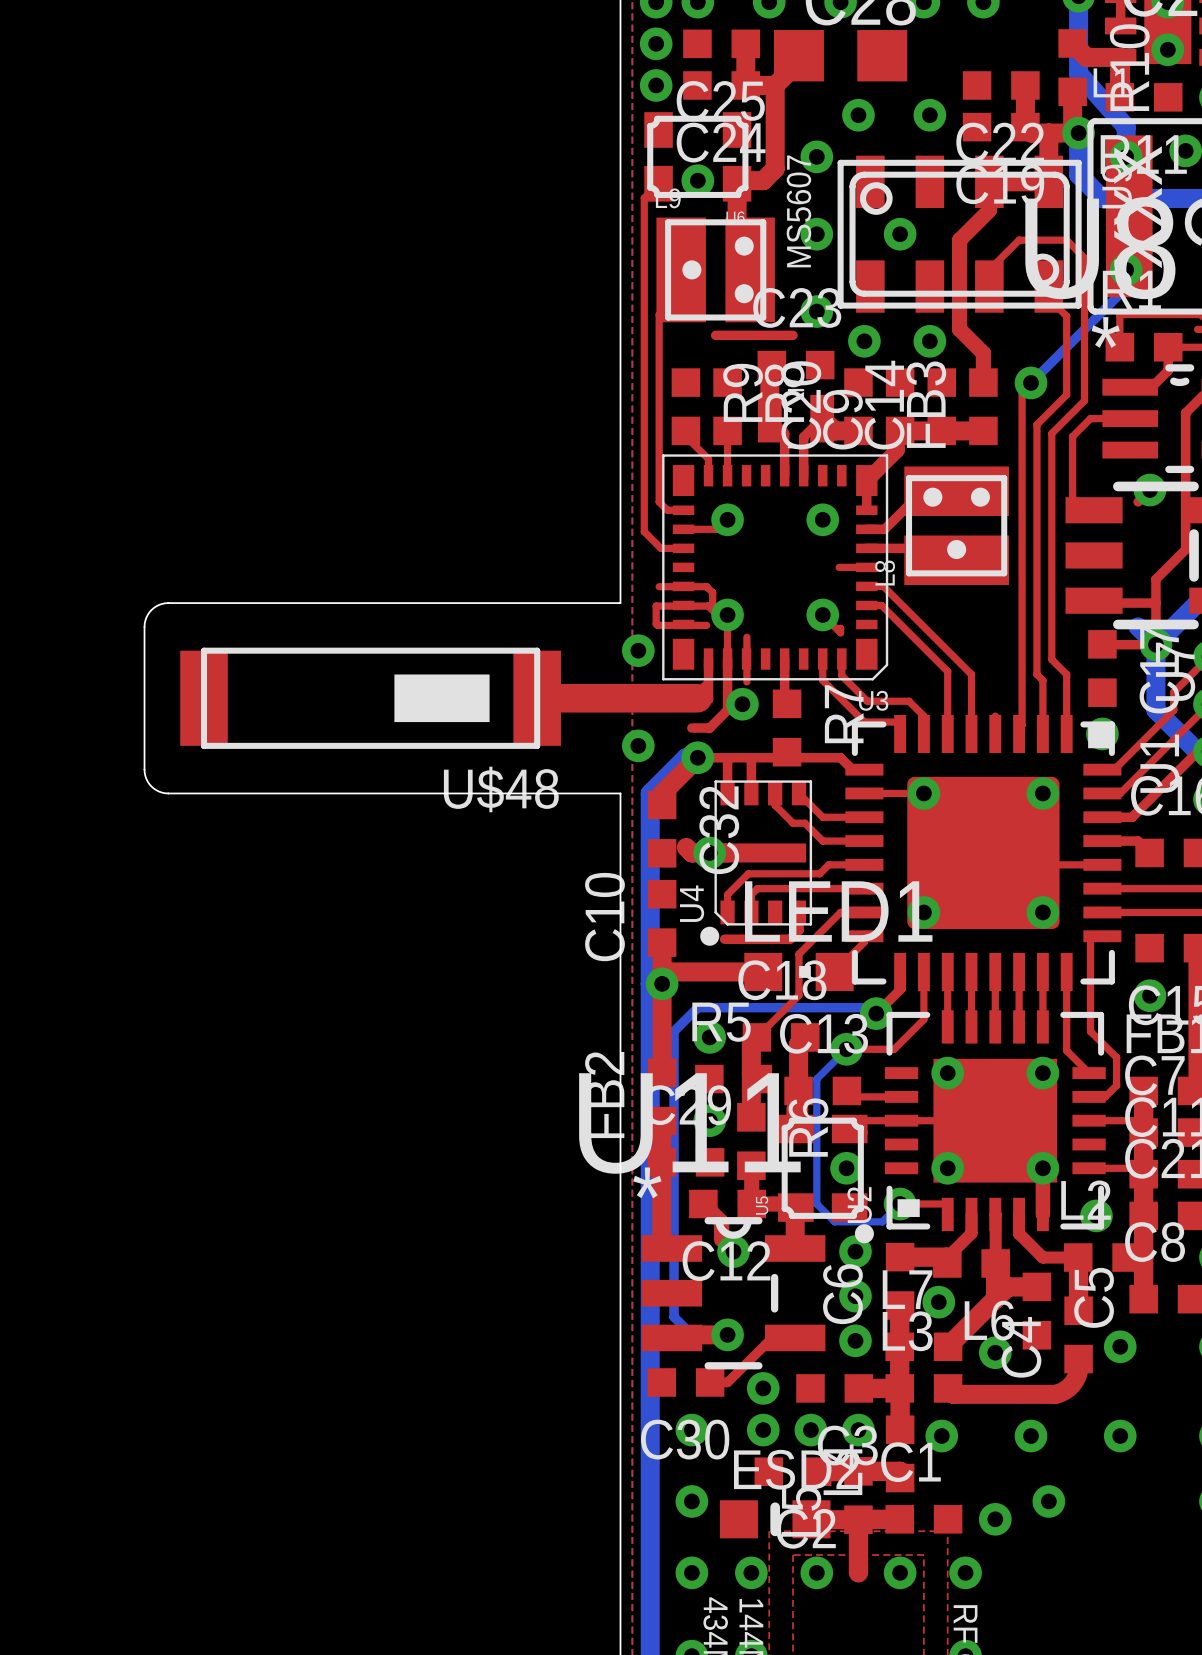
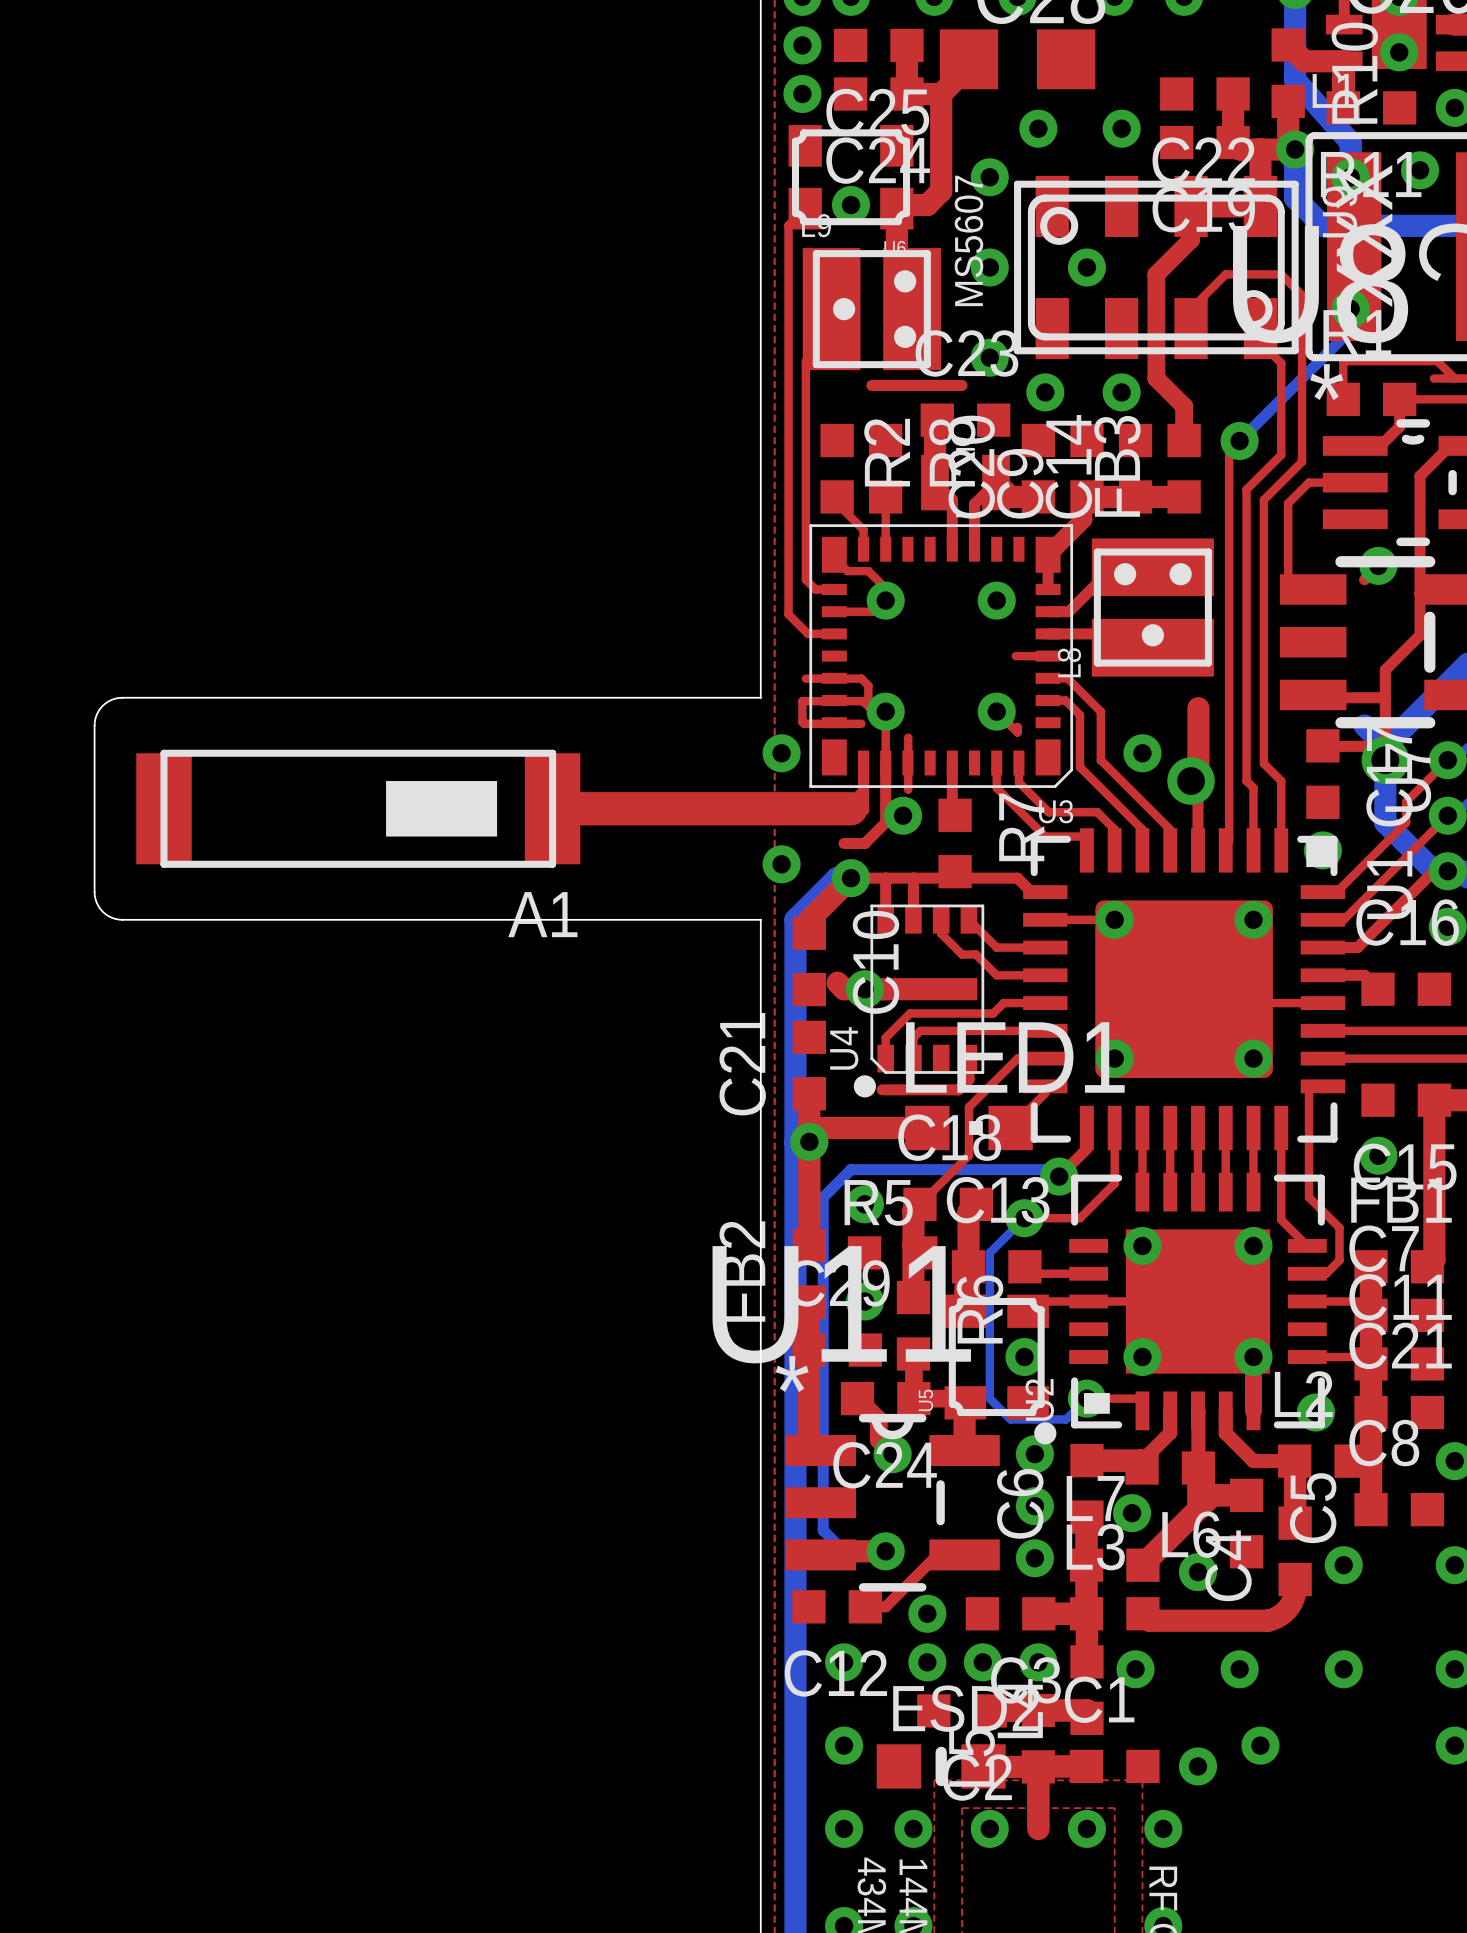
R9 name: R9 (743, 392) -> R2 (887, 452)
top track: none -> (834, 556) (847, 571) (868, 571) (885, 588) (885, 600)
board edge: (168, 603) (159, 604) (151, 610) (146, 617) (144, 626) (144, 772) (151, 786) (159, 791) (168, 793) -> (233, 697) (115, 698) (100, 708) (94, 725) (94, 892) (100, 908) (108, 916) (118, 919) (233, 919)
top track: none -> (1198, 708) (1198, 773) (1191, 781) (1197, 787) (1197, 829)
top track: (912, 614) (971, 674) (971, 716) -> (1100, 711) (1100, 760) (1170, 829)
top track: (894, 617) (947, 671) (947, 716) -> (1080, 715) (1080, 767) (1142, 829)
via position: (1155, 644) -> (1142, 753)
via: none -> (1385, 760)
via: none -> (1191, 781)
A1: none -> (358, 808)
U$48: (370, 698) -> none
top track: none -> (552, 808) (663, 808)
C32 name: C32 (719, 830) -> C10 (875, 962)
C10 name: C10 (604, 917) -> C21 (742, 1064)
R5 name position: R5 (721, 1022) -> R5 (878, 1202)
C12 name: C12 (726, 1261) -> C24 (885, 1465)
C30 name: C30 (685, 1439) -> C12 (835, 1673)

